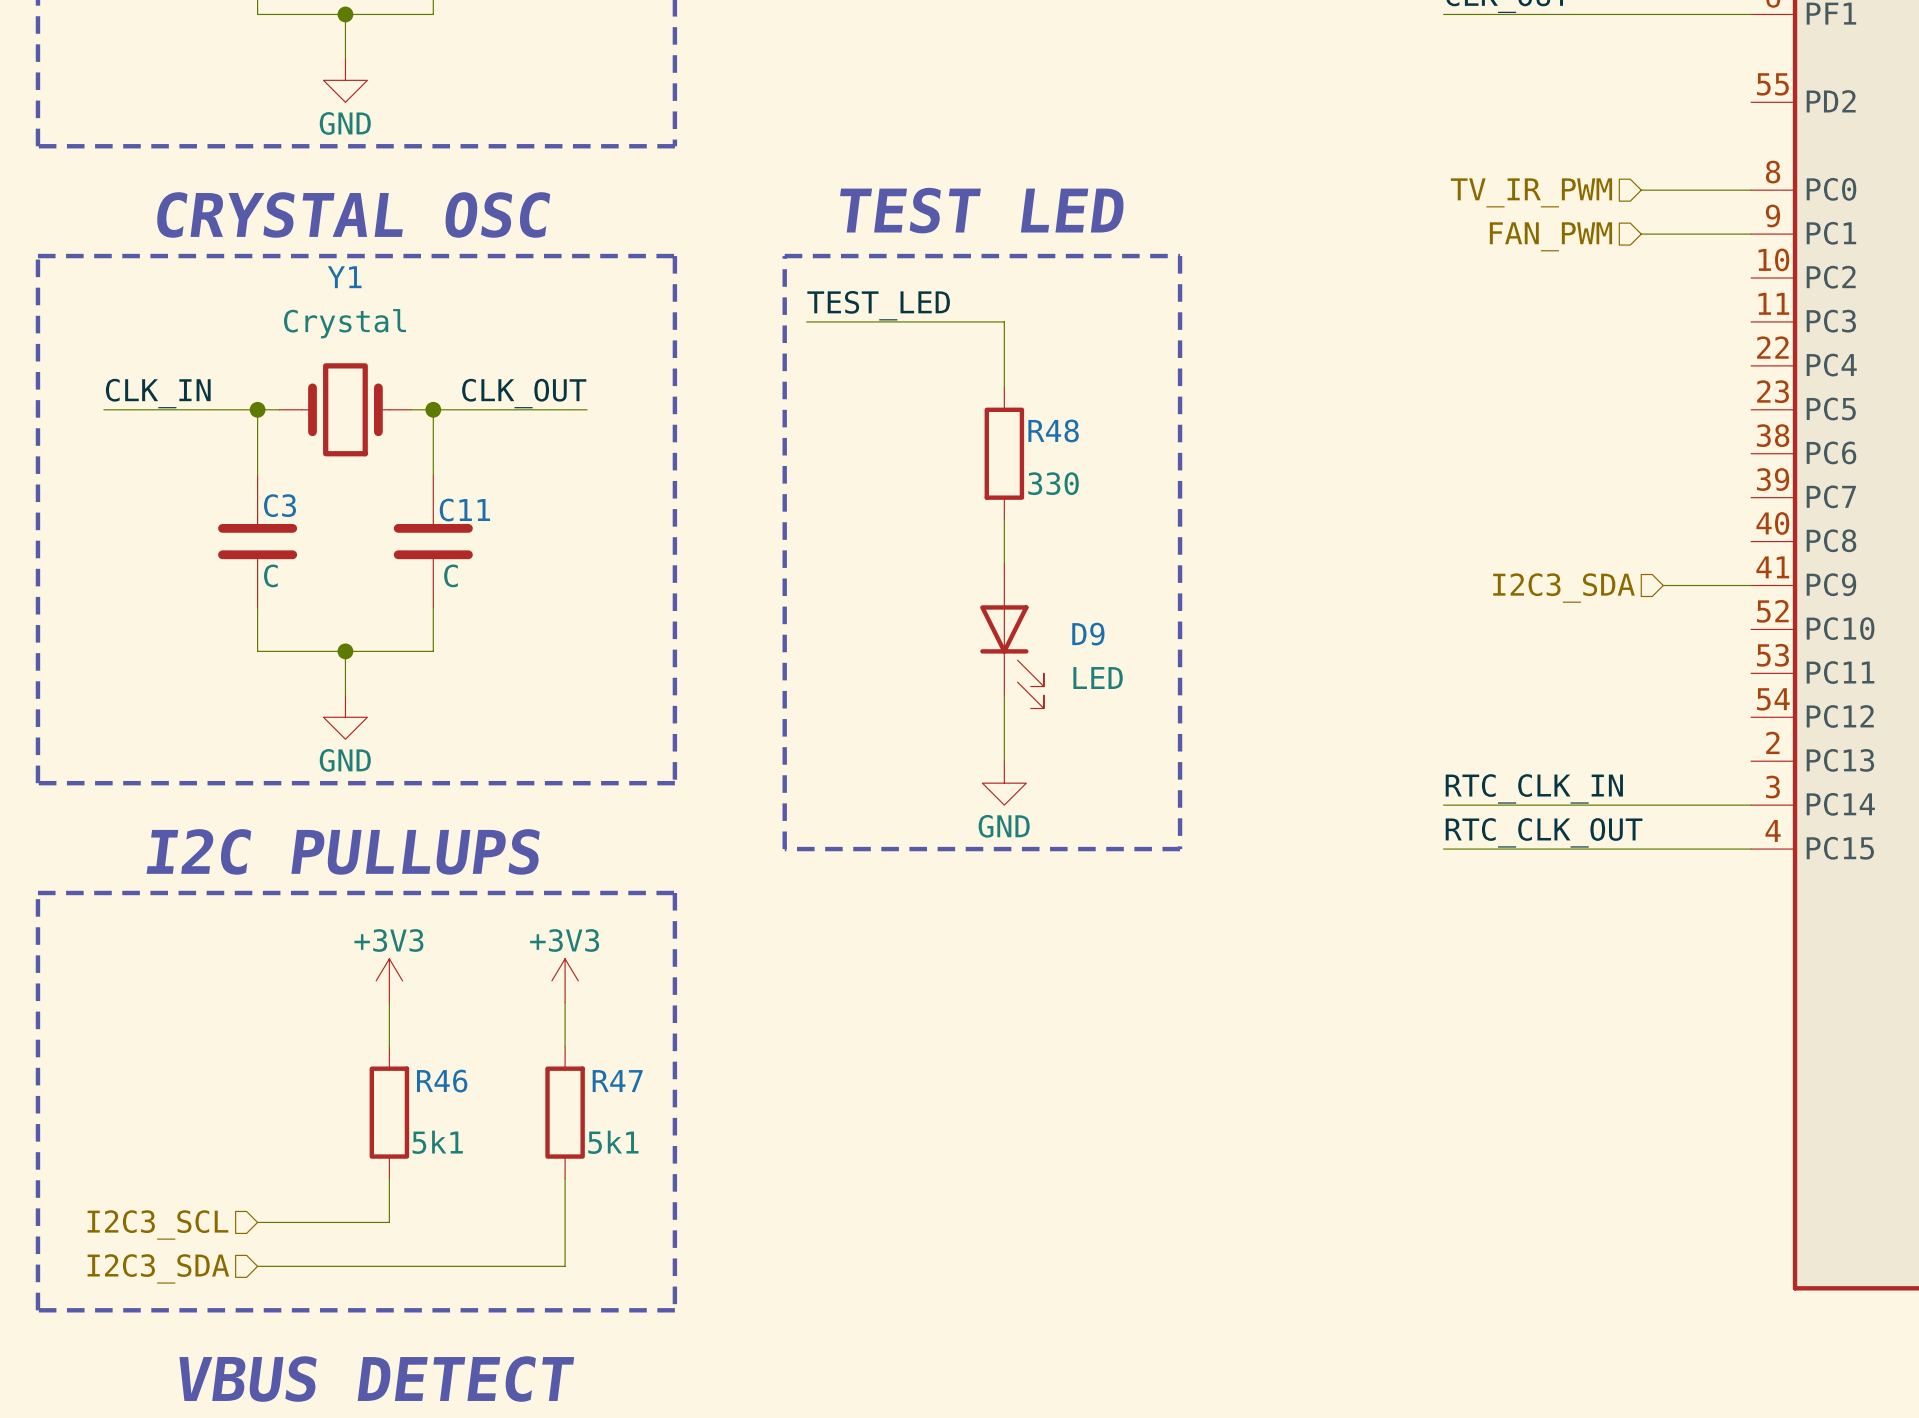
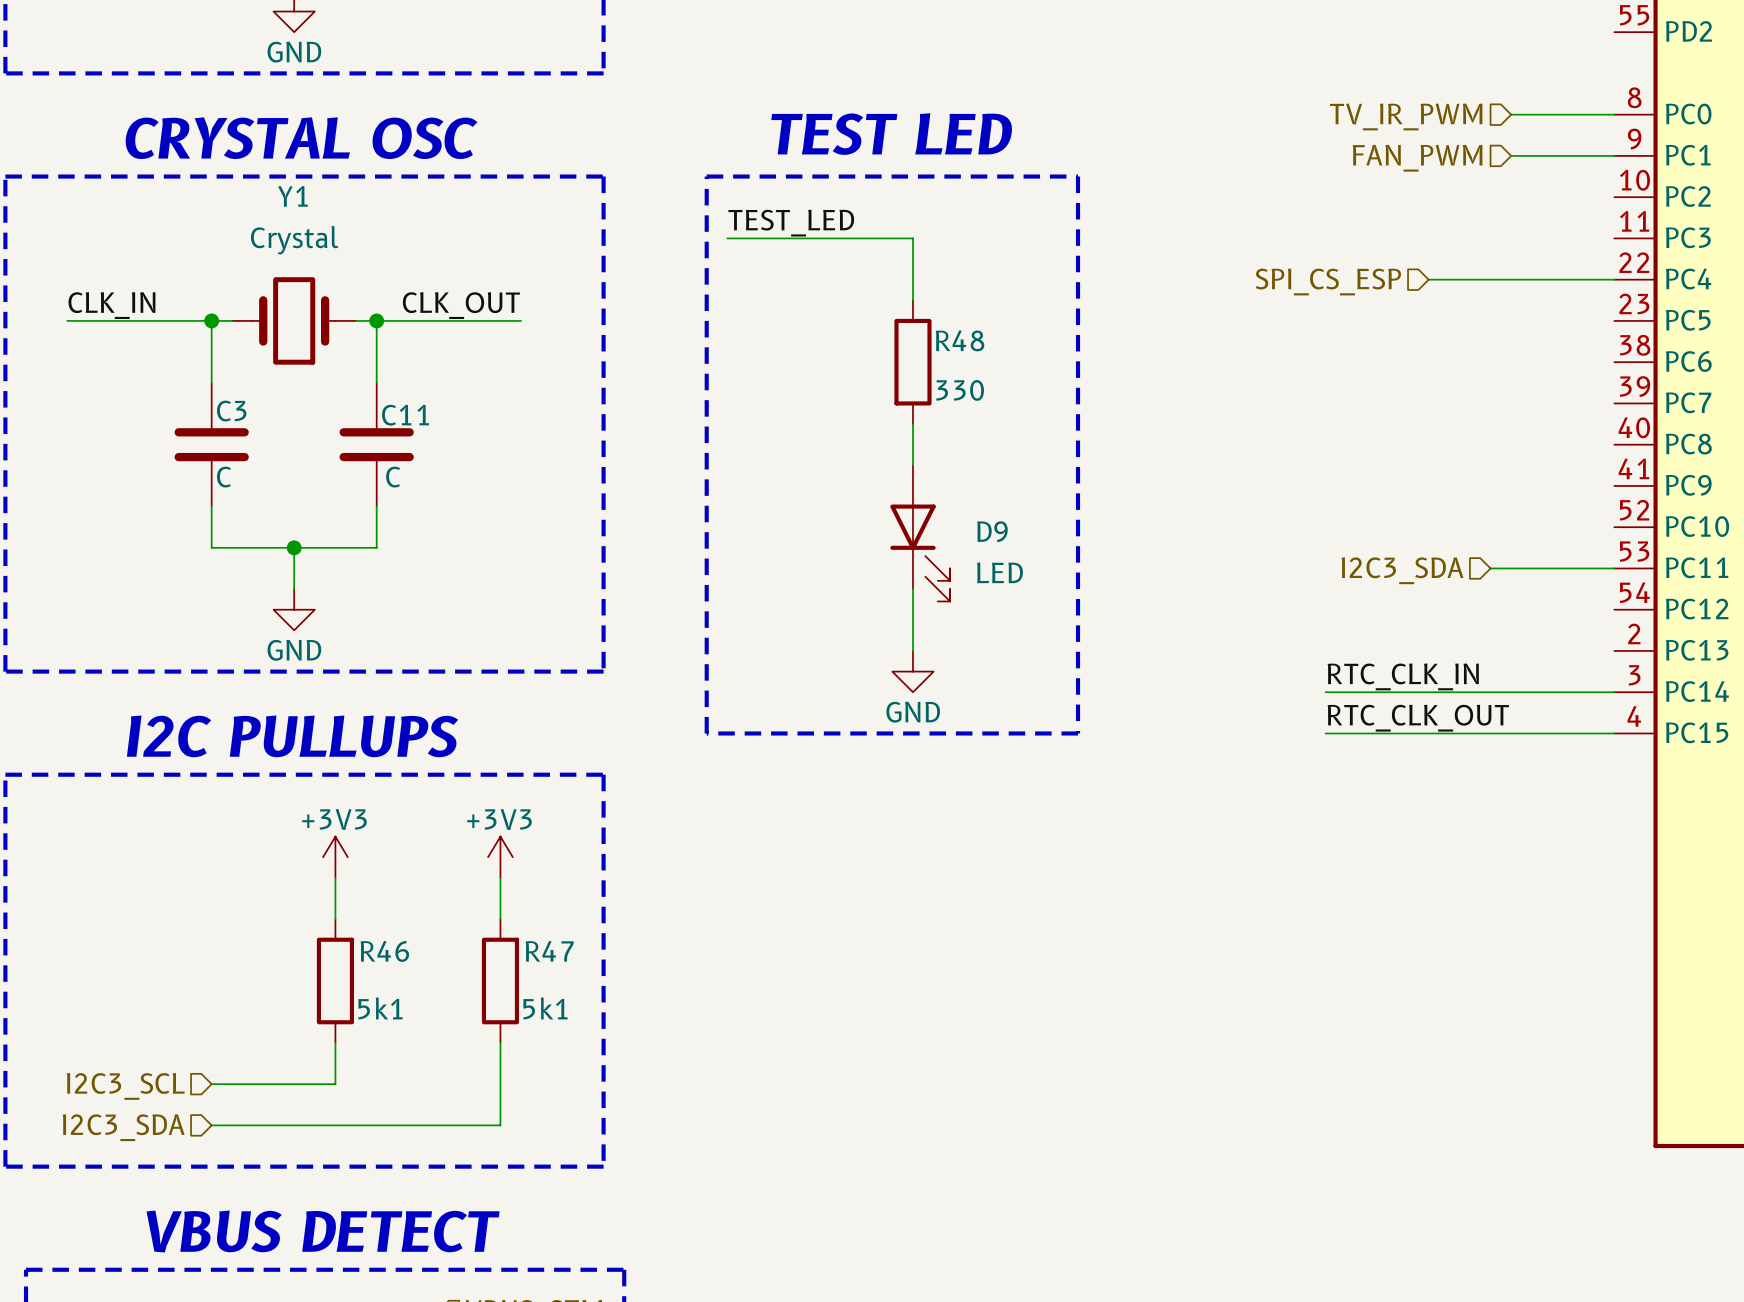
wire: none -> (1428, 279) (1614, 279)
hierarchical label: none -> SPI_CS_ESP (1328, 281)
wire: (1663, 585) (1751, 585) -> none
hierarchical label position: I2C3_SDA (1564, 588) -> I2C3_SDA (1402, 570)
wire: none -> (1490, 568) (1614, 568)

